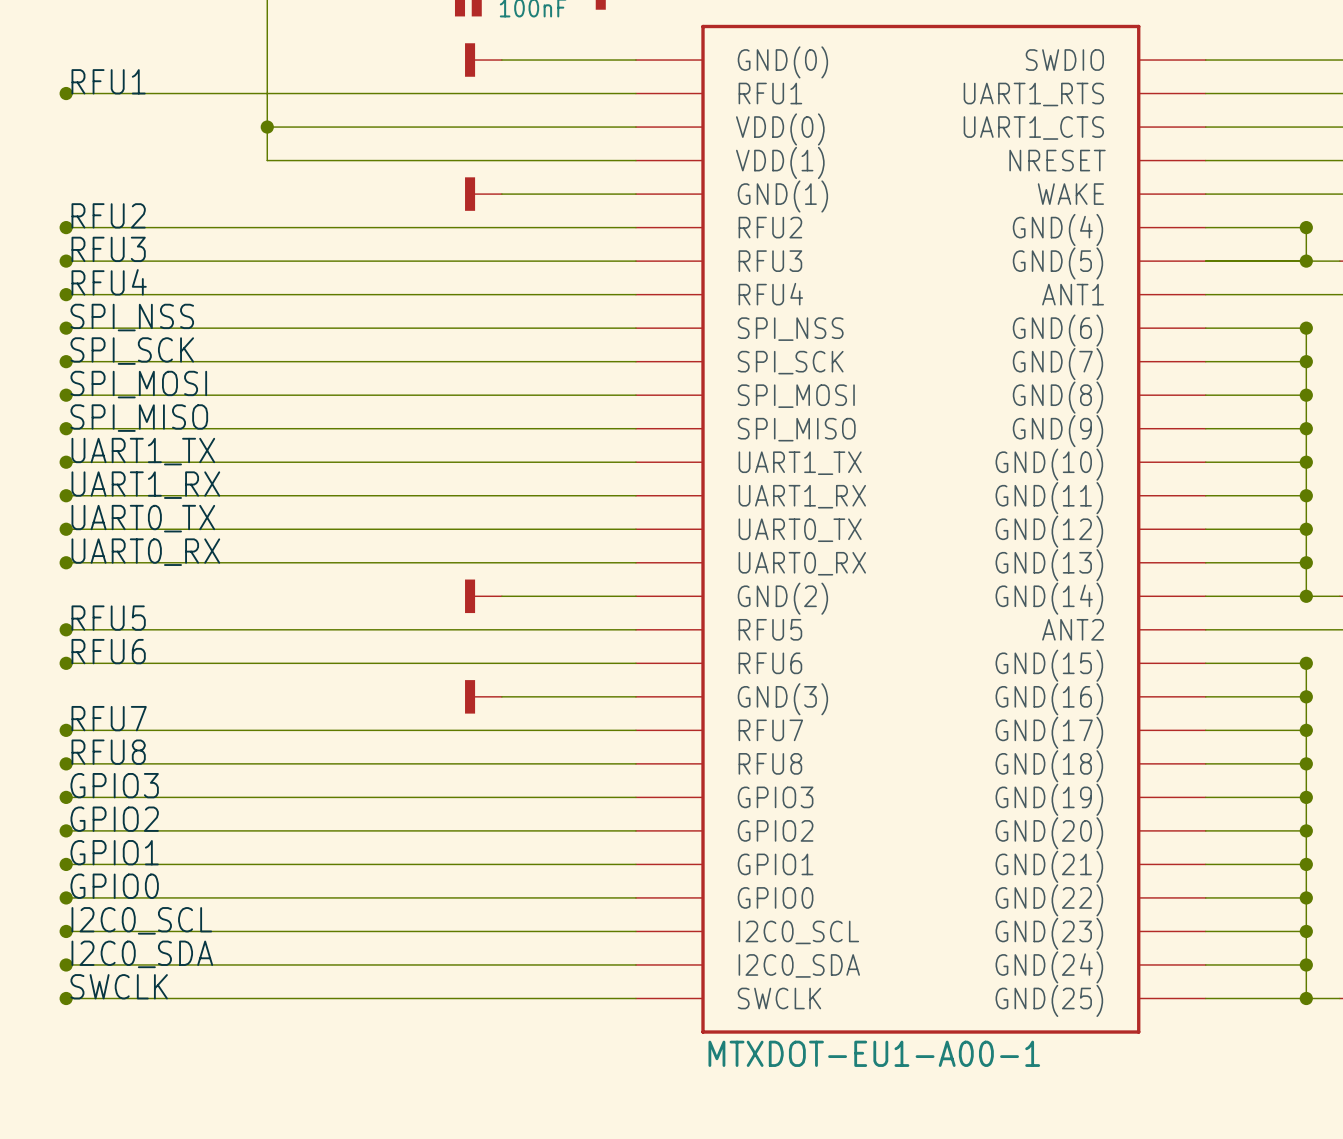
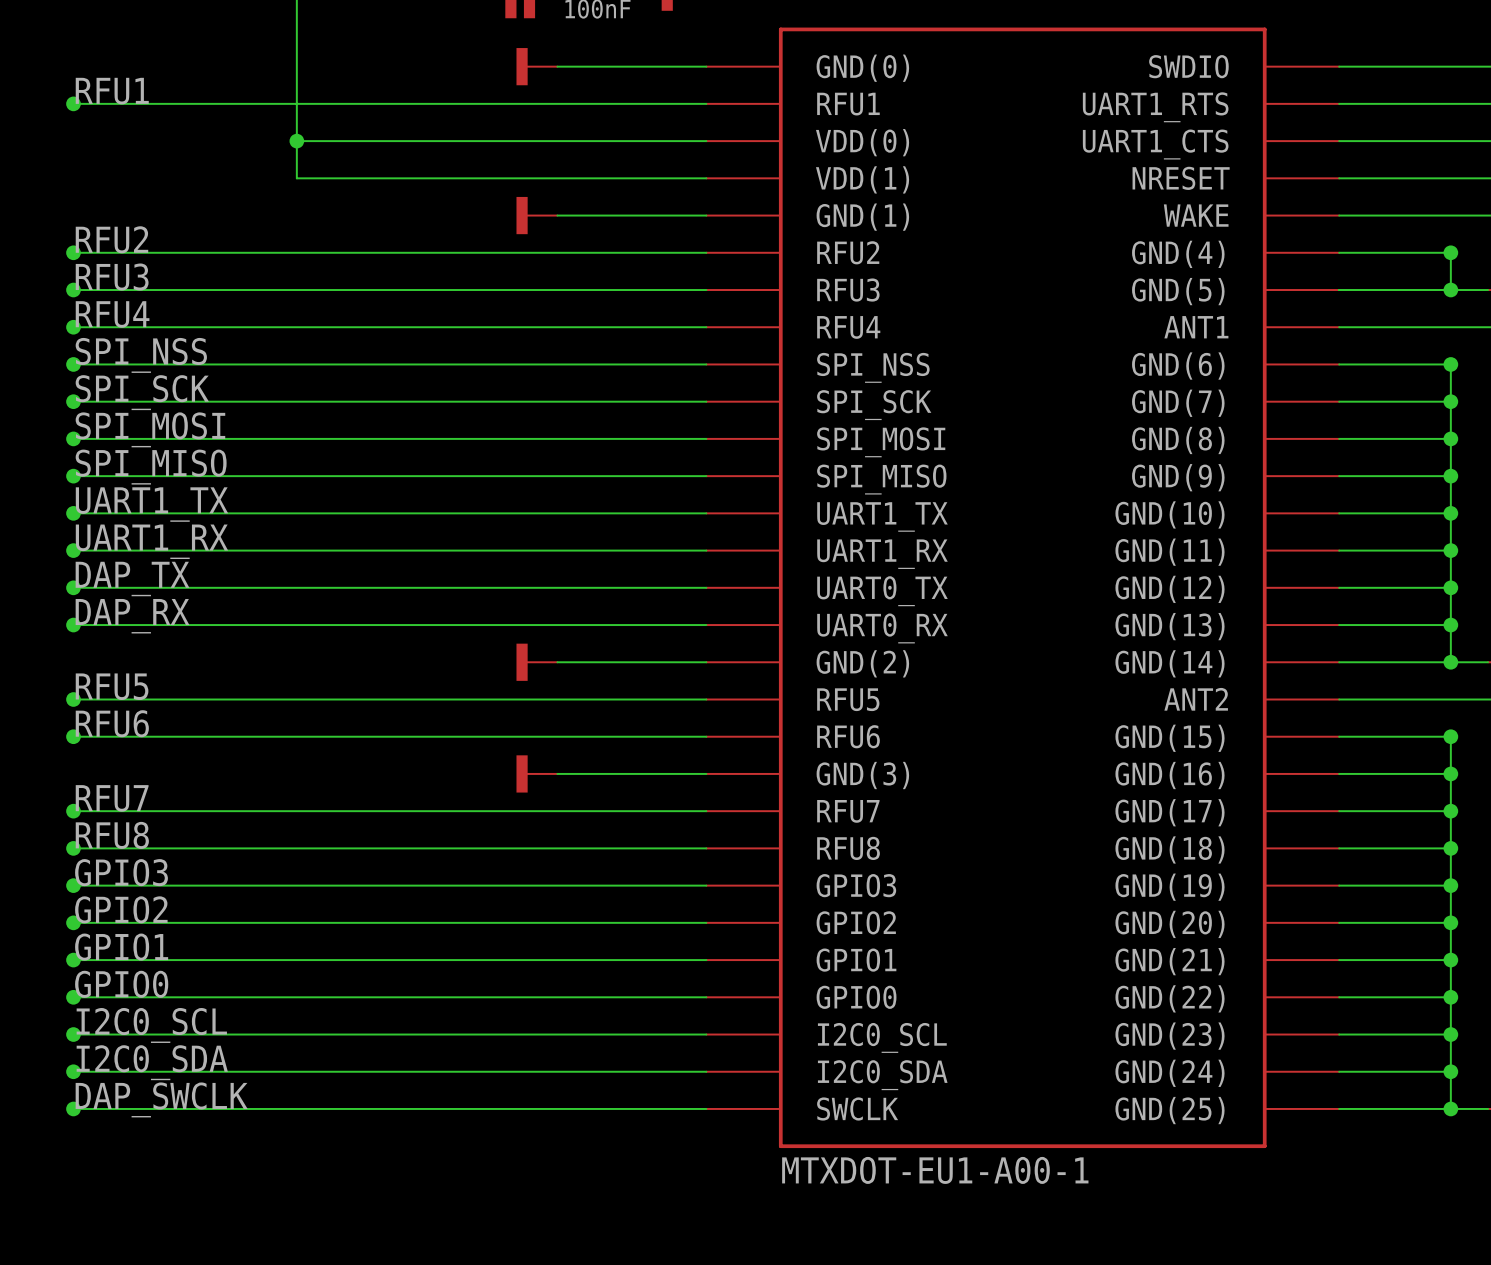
label: UART0_TX (143, 518) -> DAP_TX (132, 579)
label: UART0_RX (145, 552) -> DAP_RX (132, 616)
label: SWCLK (119, 986) -> DAP_SWCLK (161, 1099)

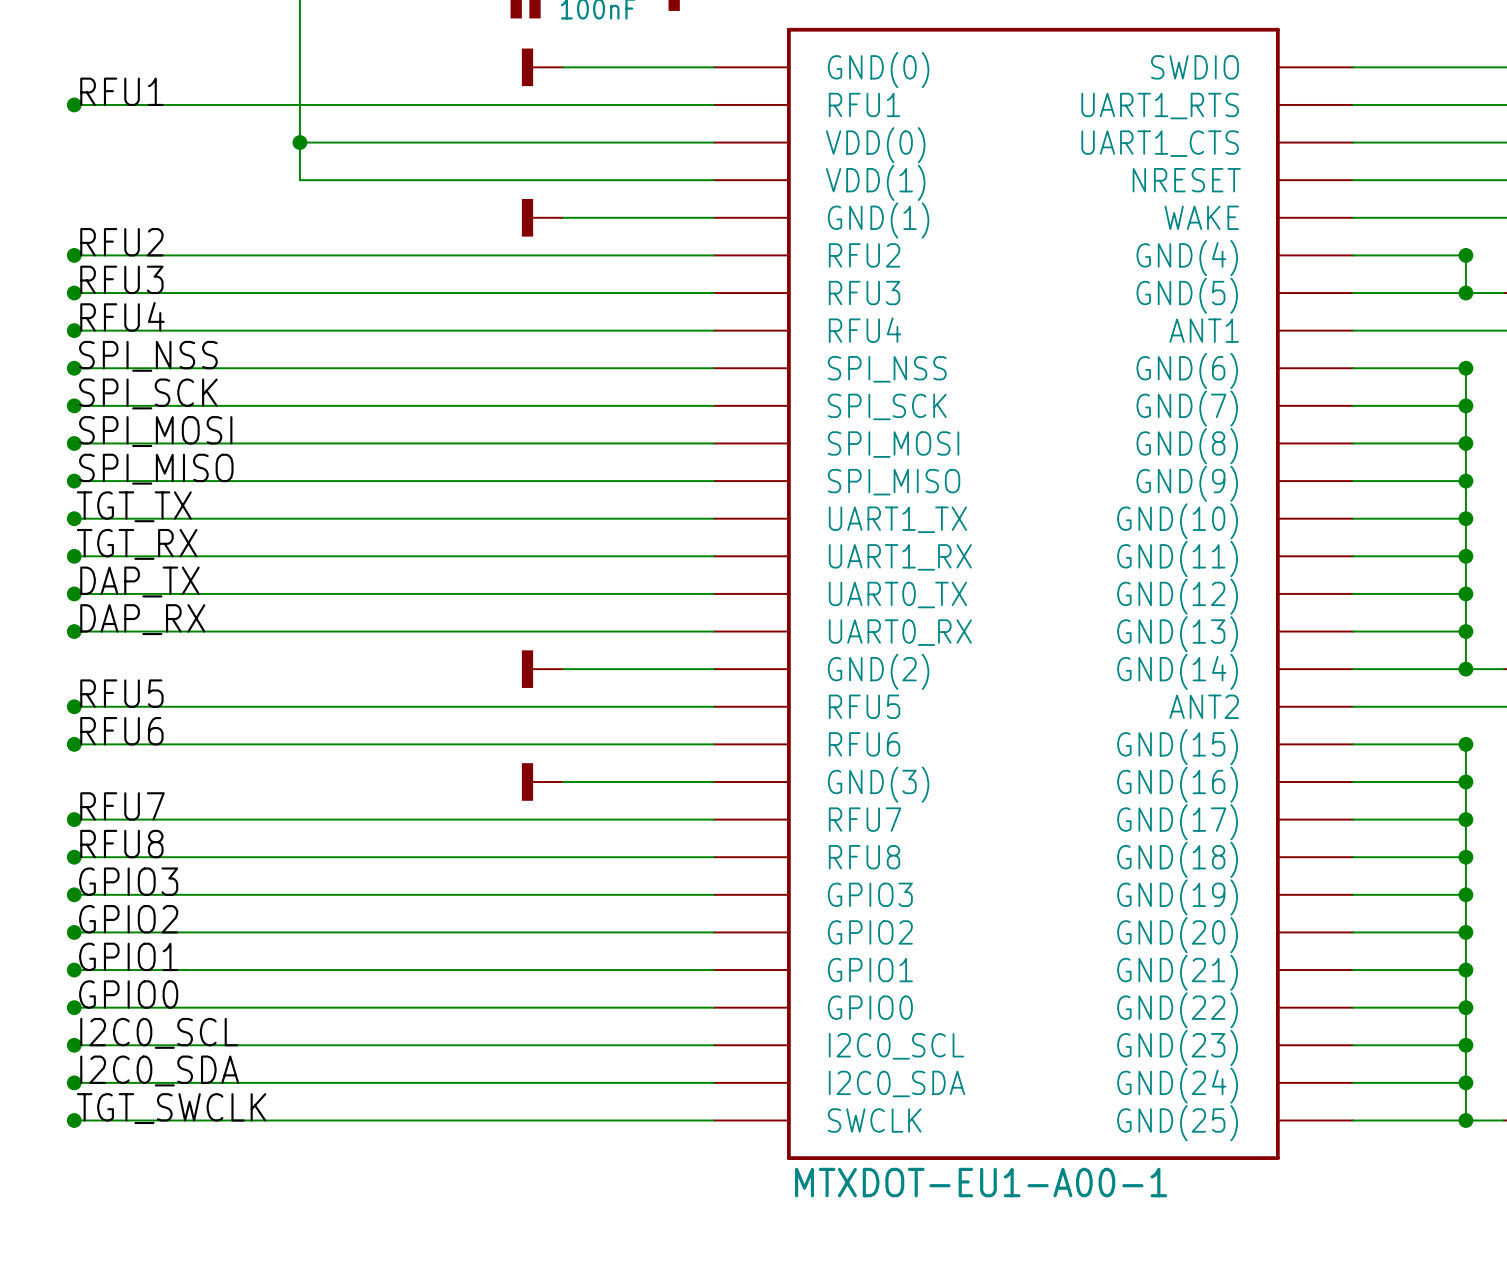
label: UART1_TX (151, 504) -> TGT_TX (134, 506)
label: UART1_RX (151, 541) -> TGT_RX (137, 544)
label: DAP_SWCLK (161, 1099) -> TGT_SWCLK (171, 1108)

